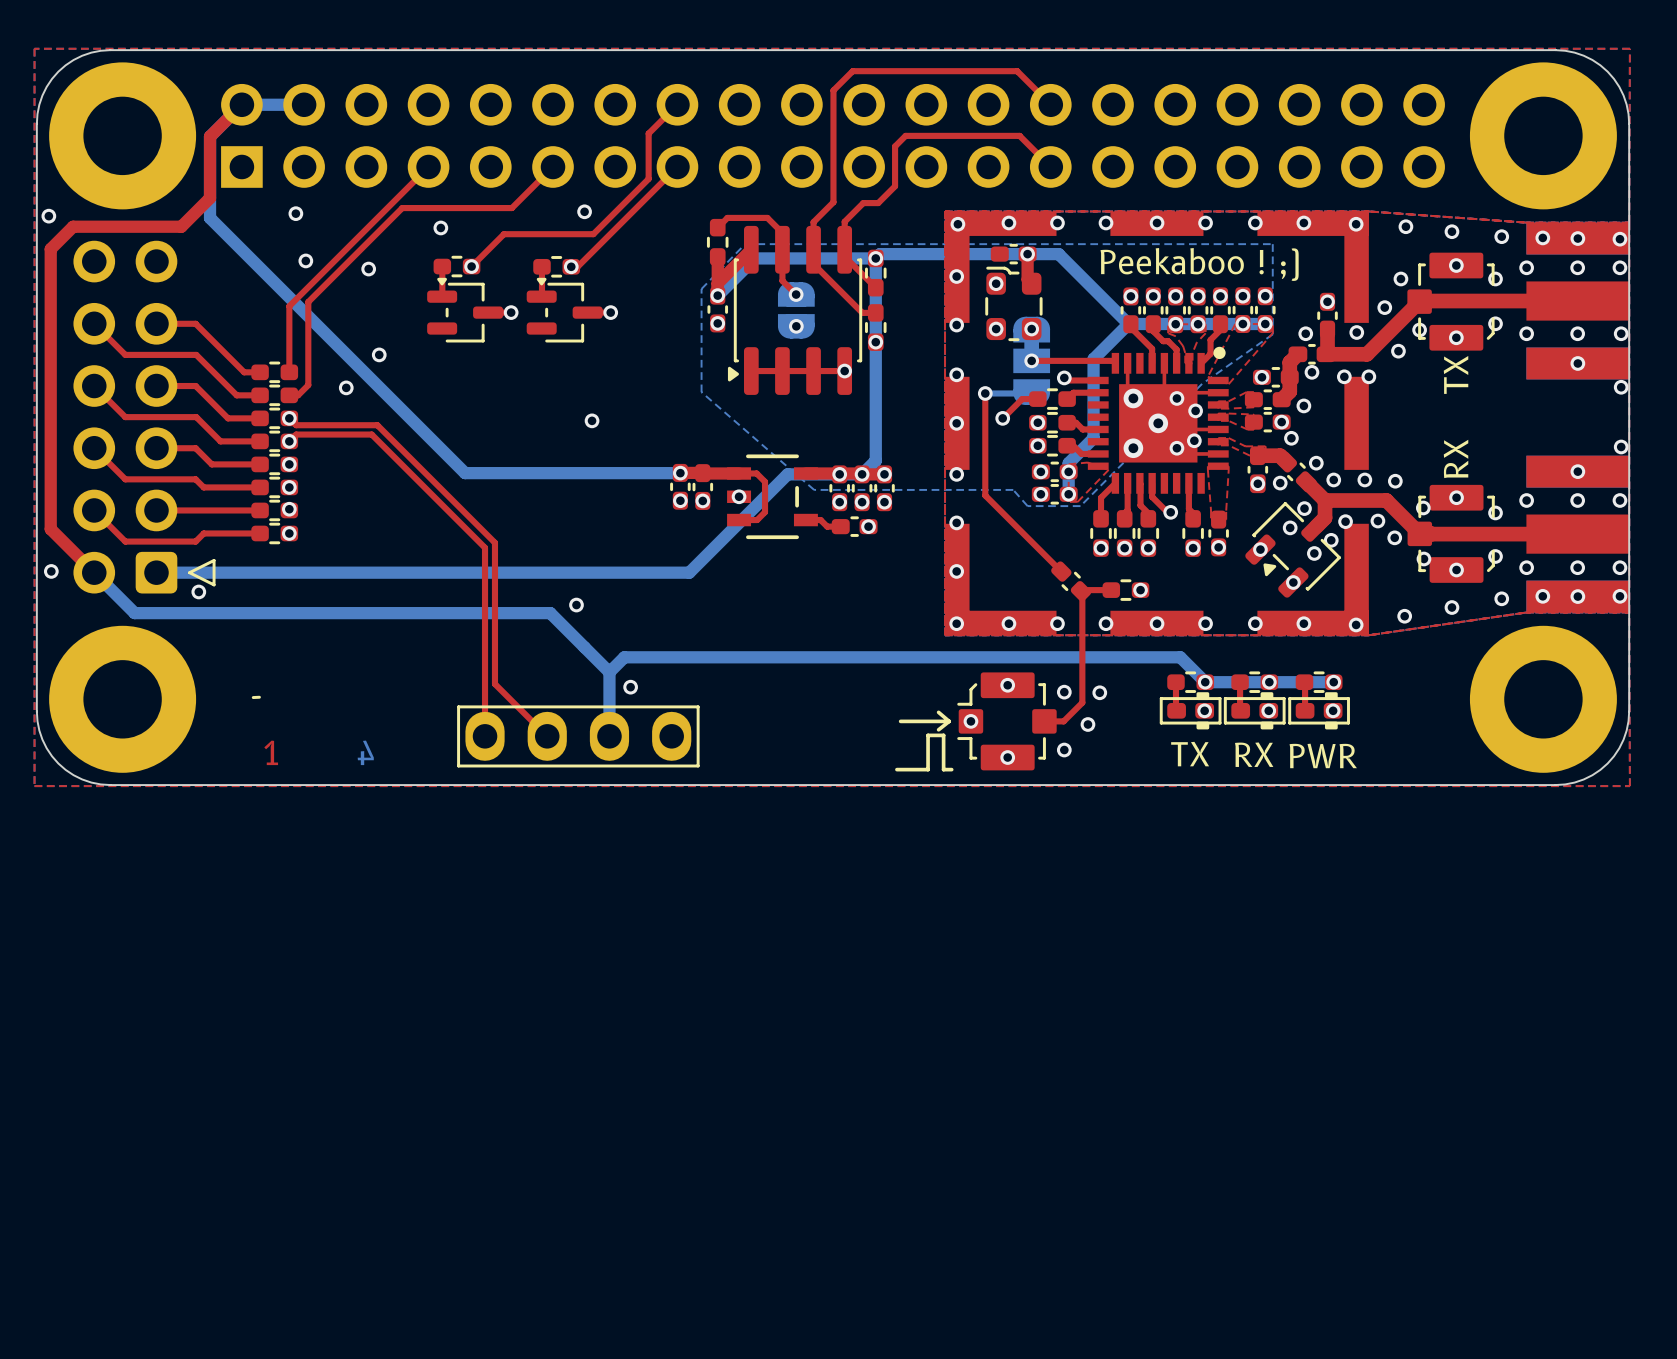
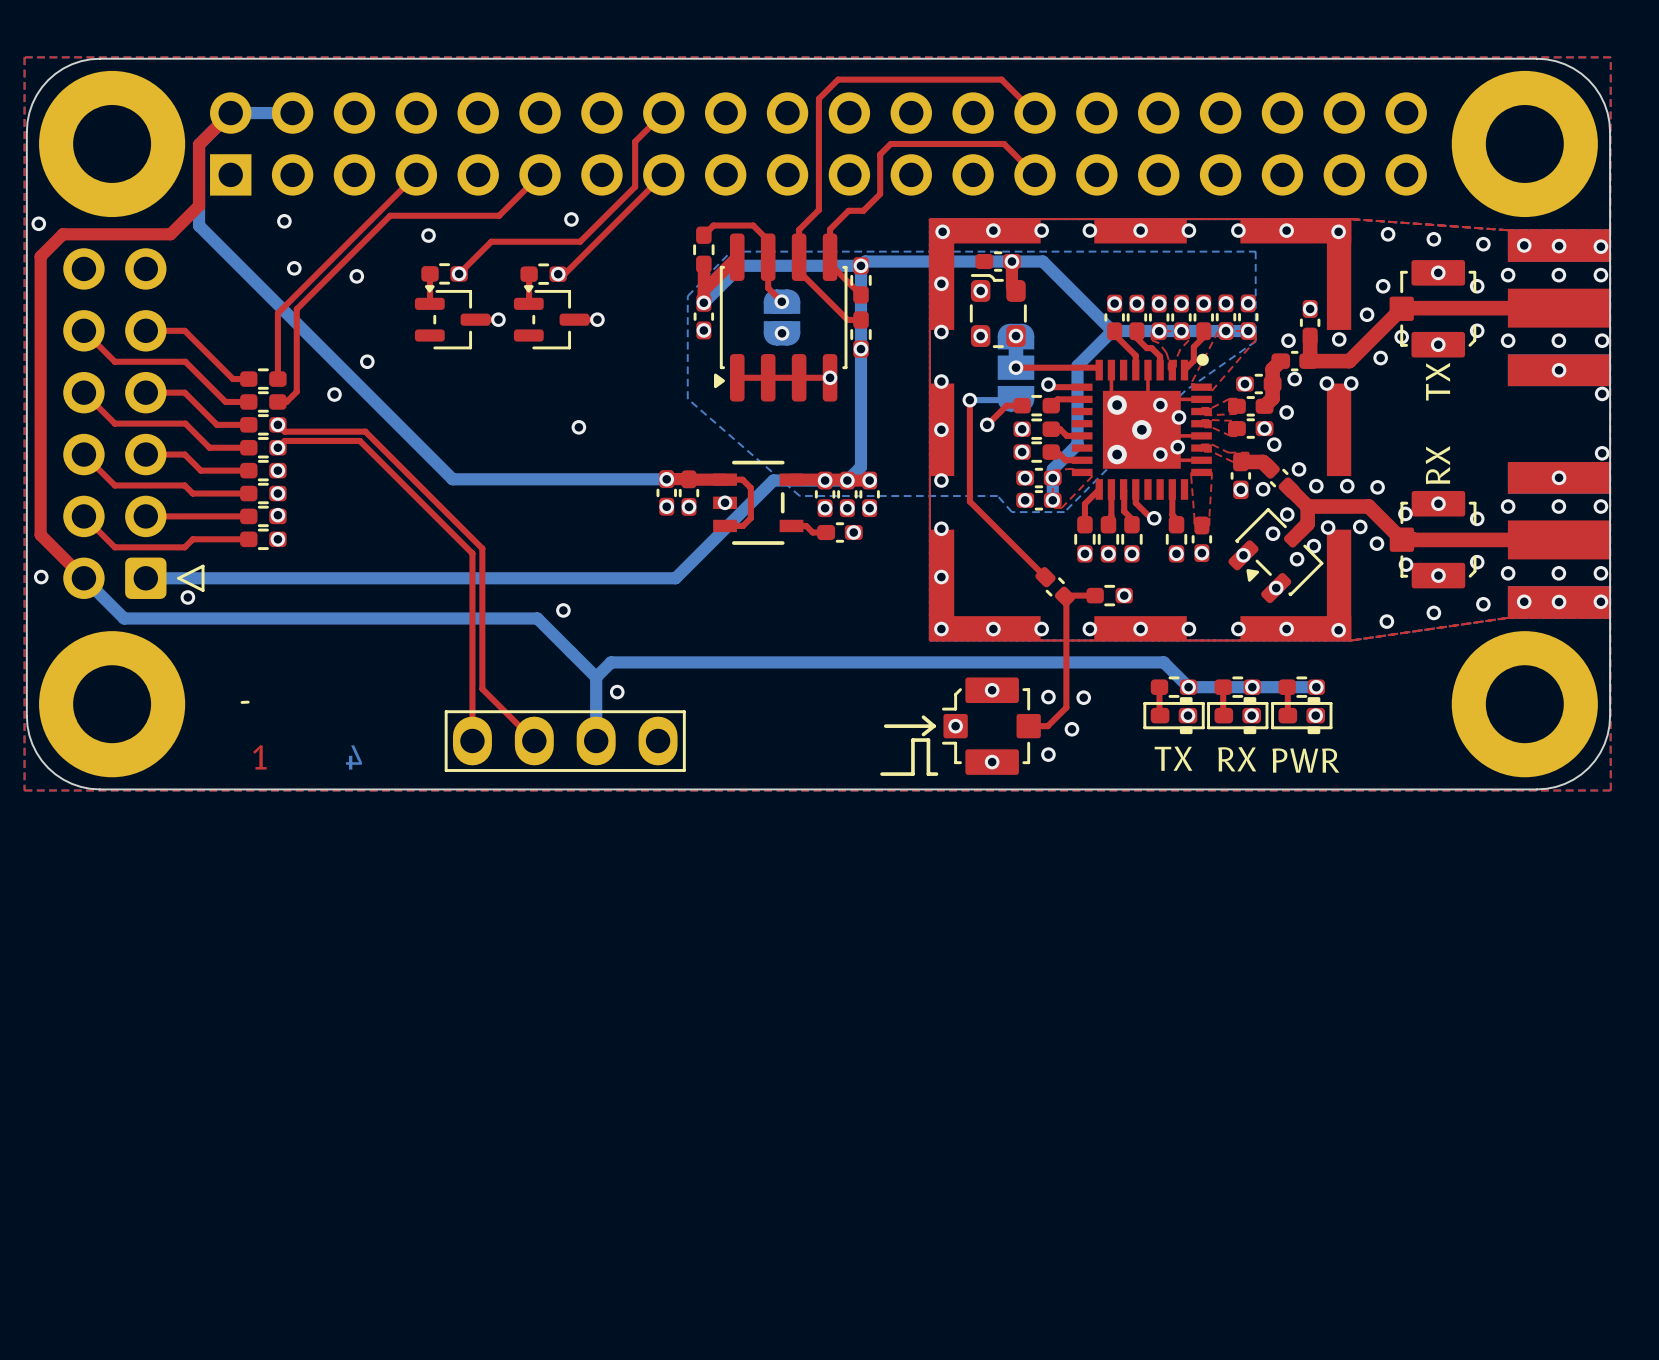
text: Peekaboo ! ;) (1199, 264) -> none

